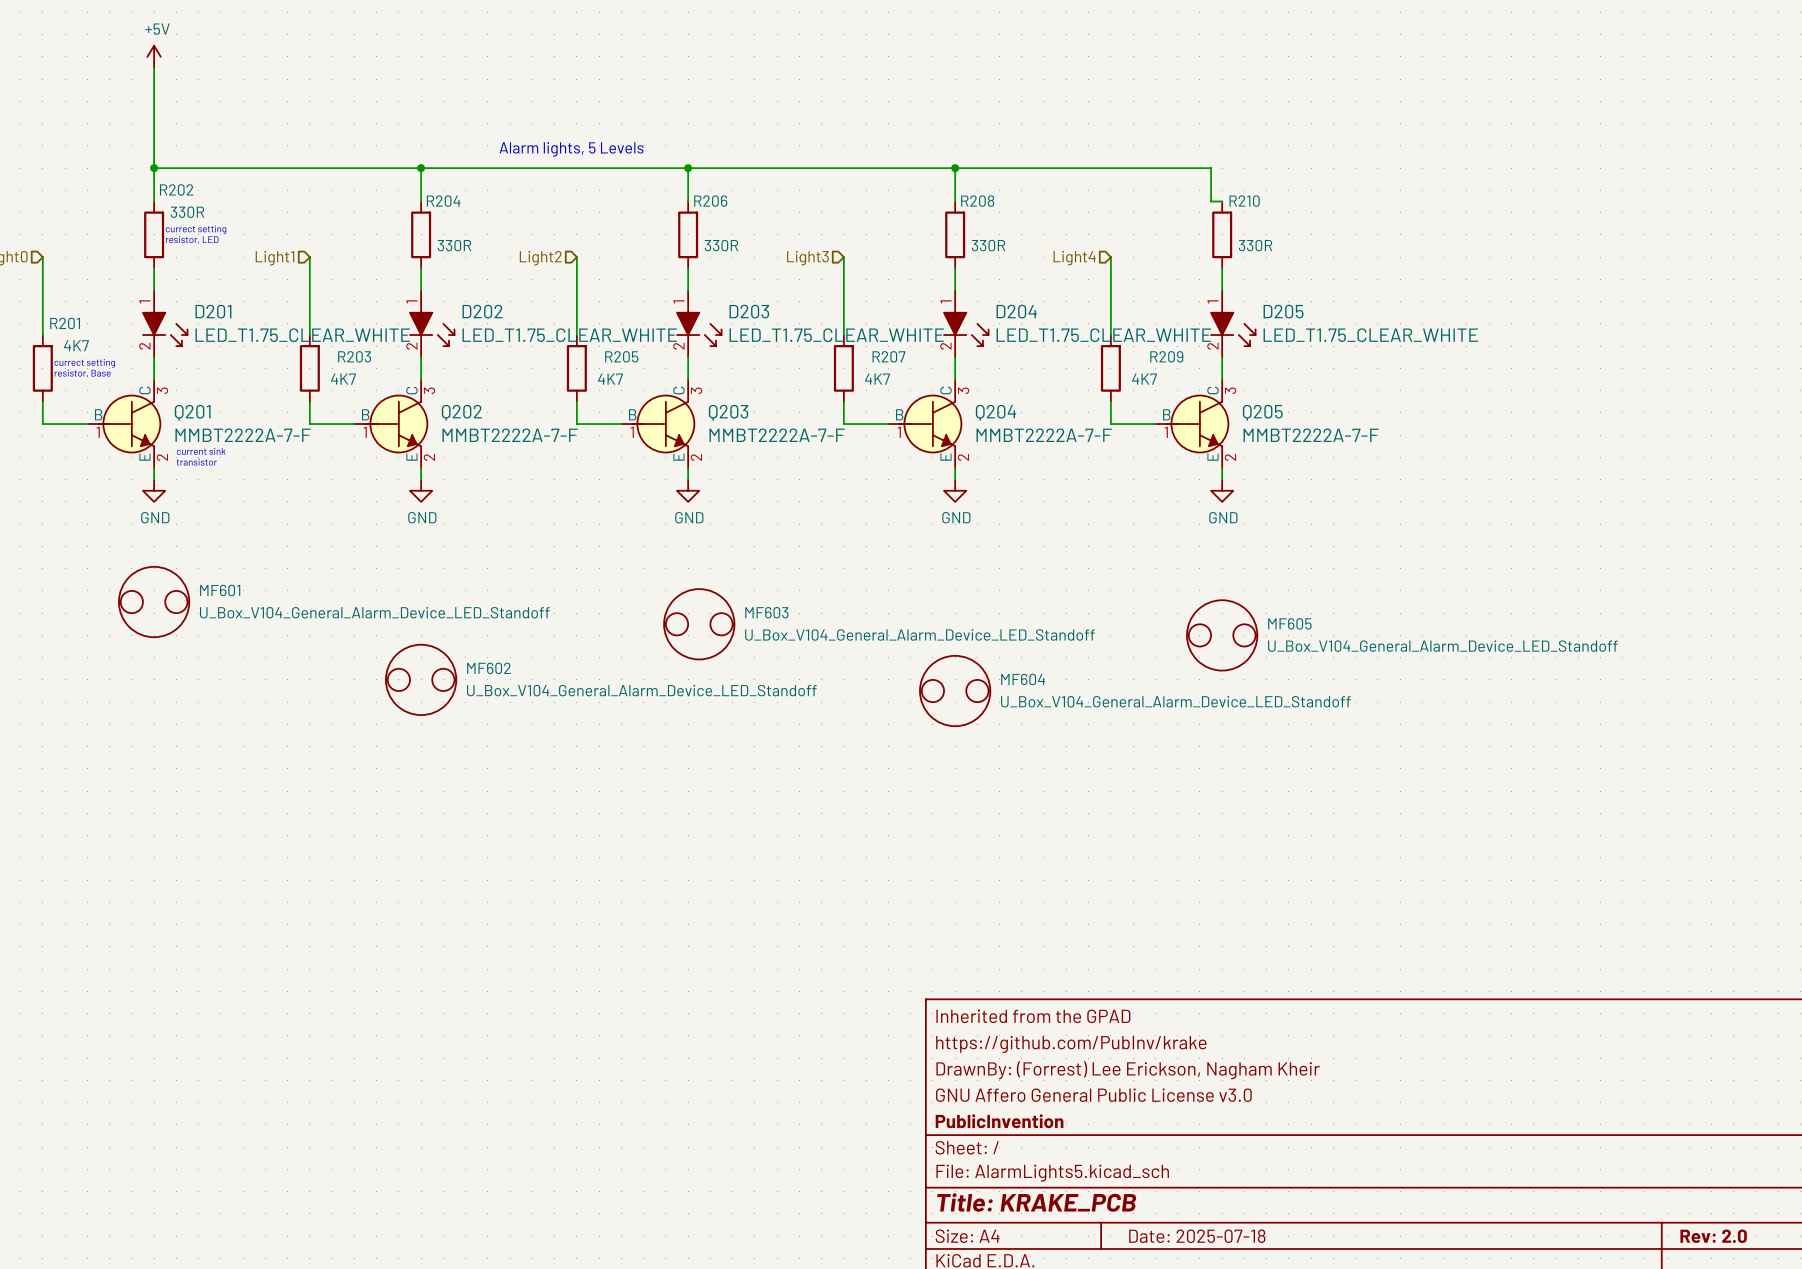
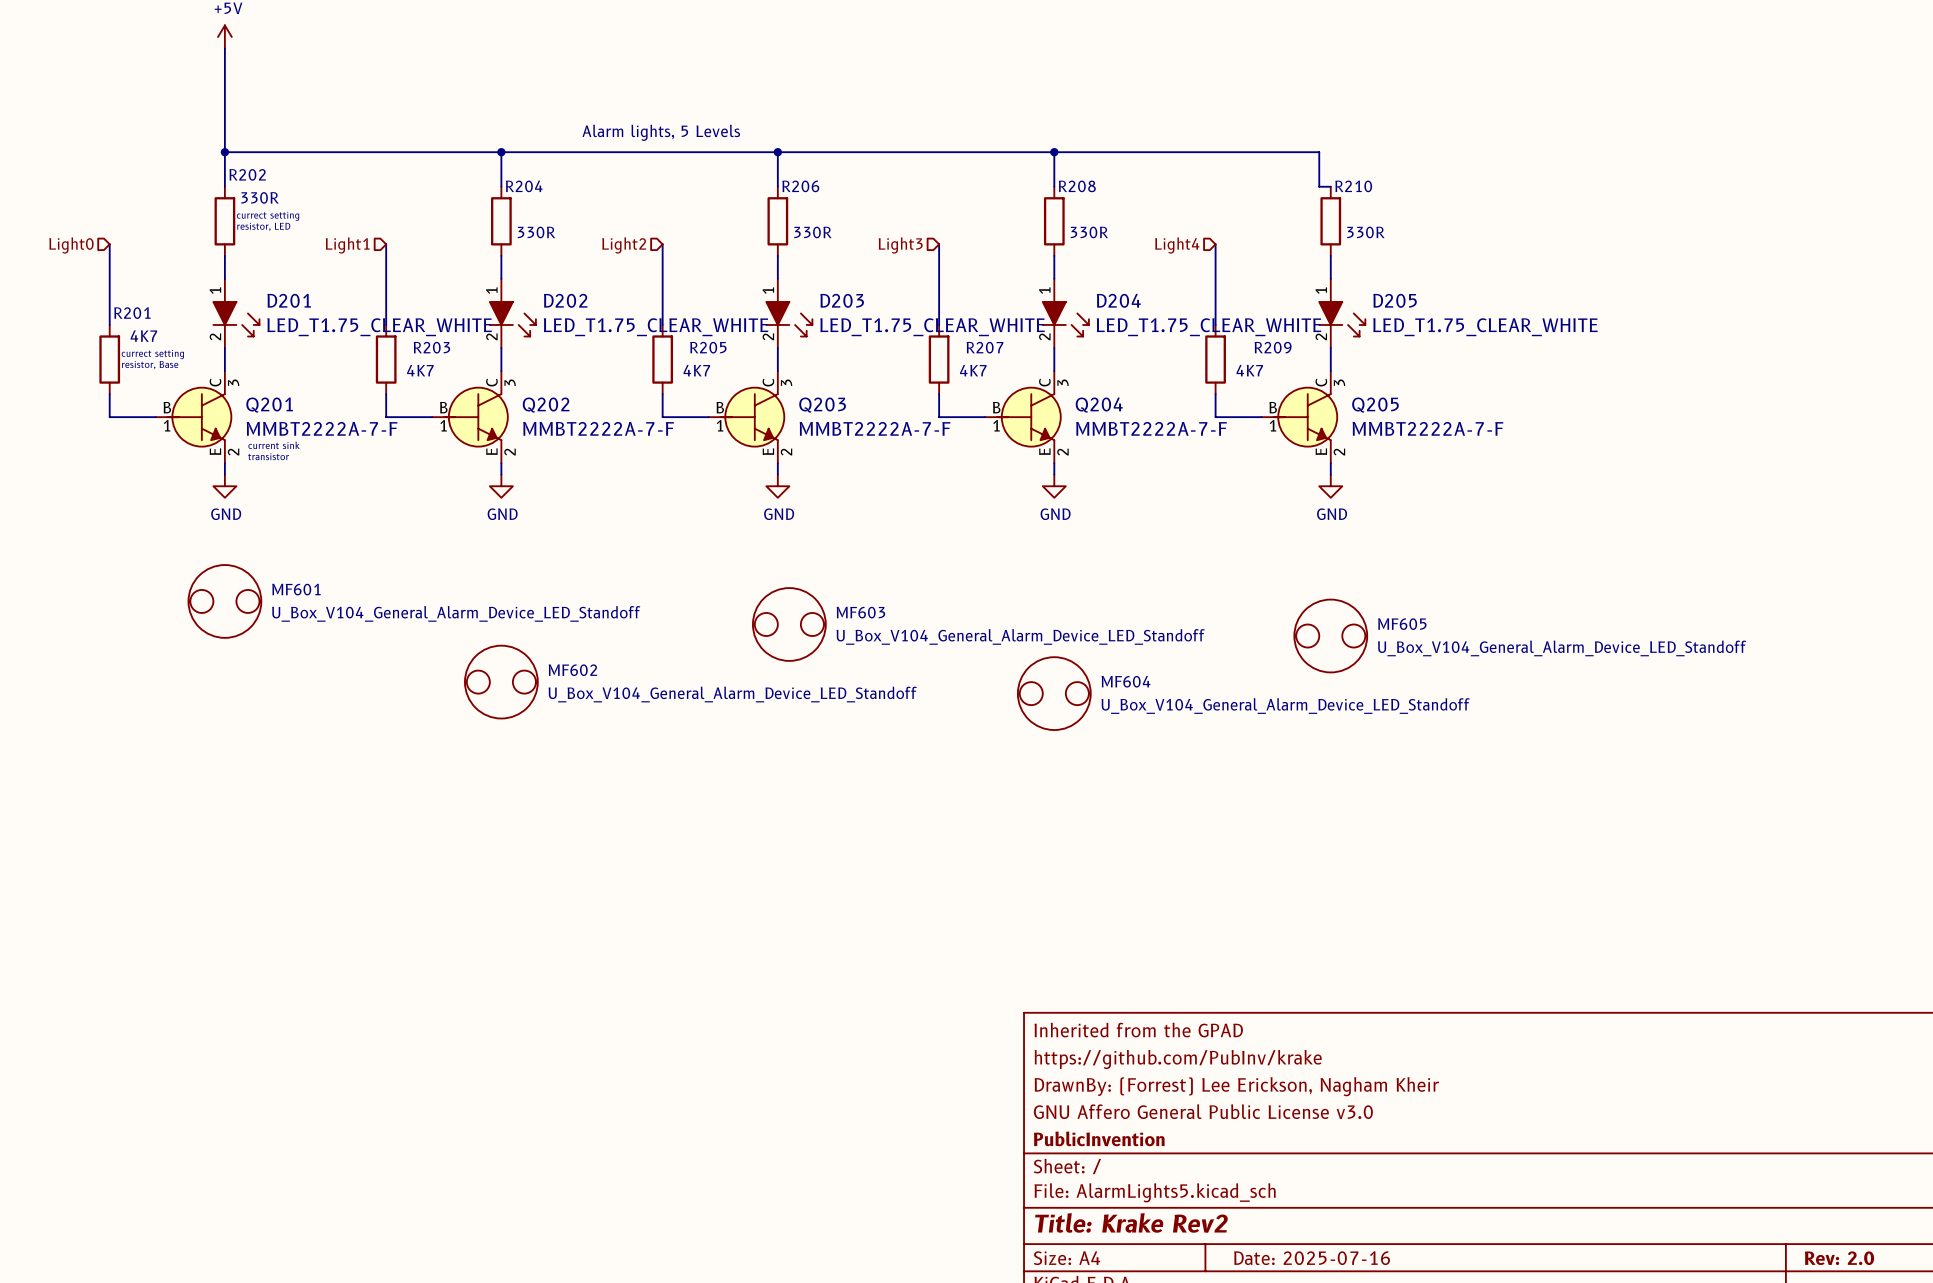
title block: Title: KRAKE_PCB (1036, 1202) -> Title: Krake Rev2 (1131, 1222)
title block: Date: 2025-07-18 (1197, 1236) -> Date: 2025-07-16 (1312, 1258)

